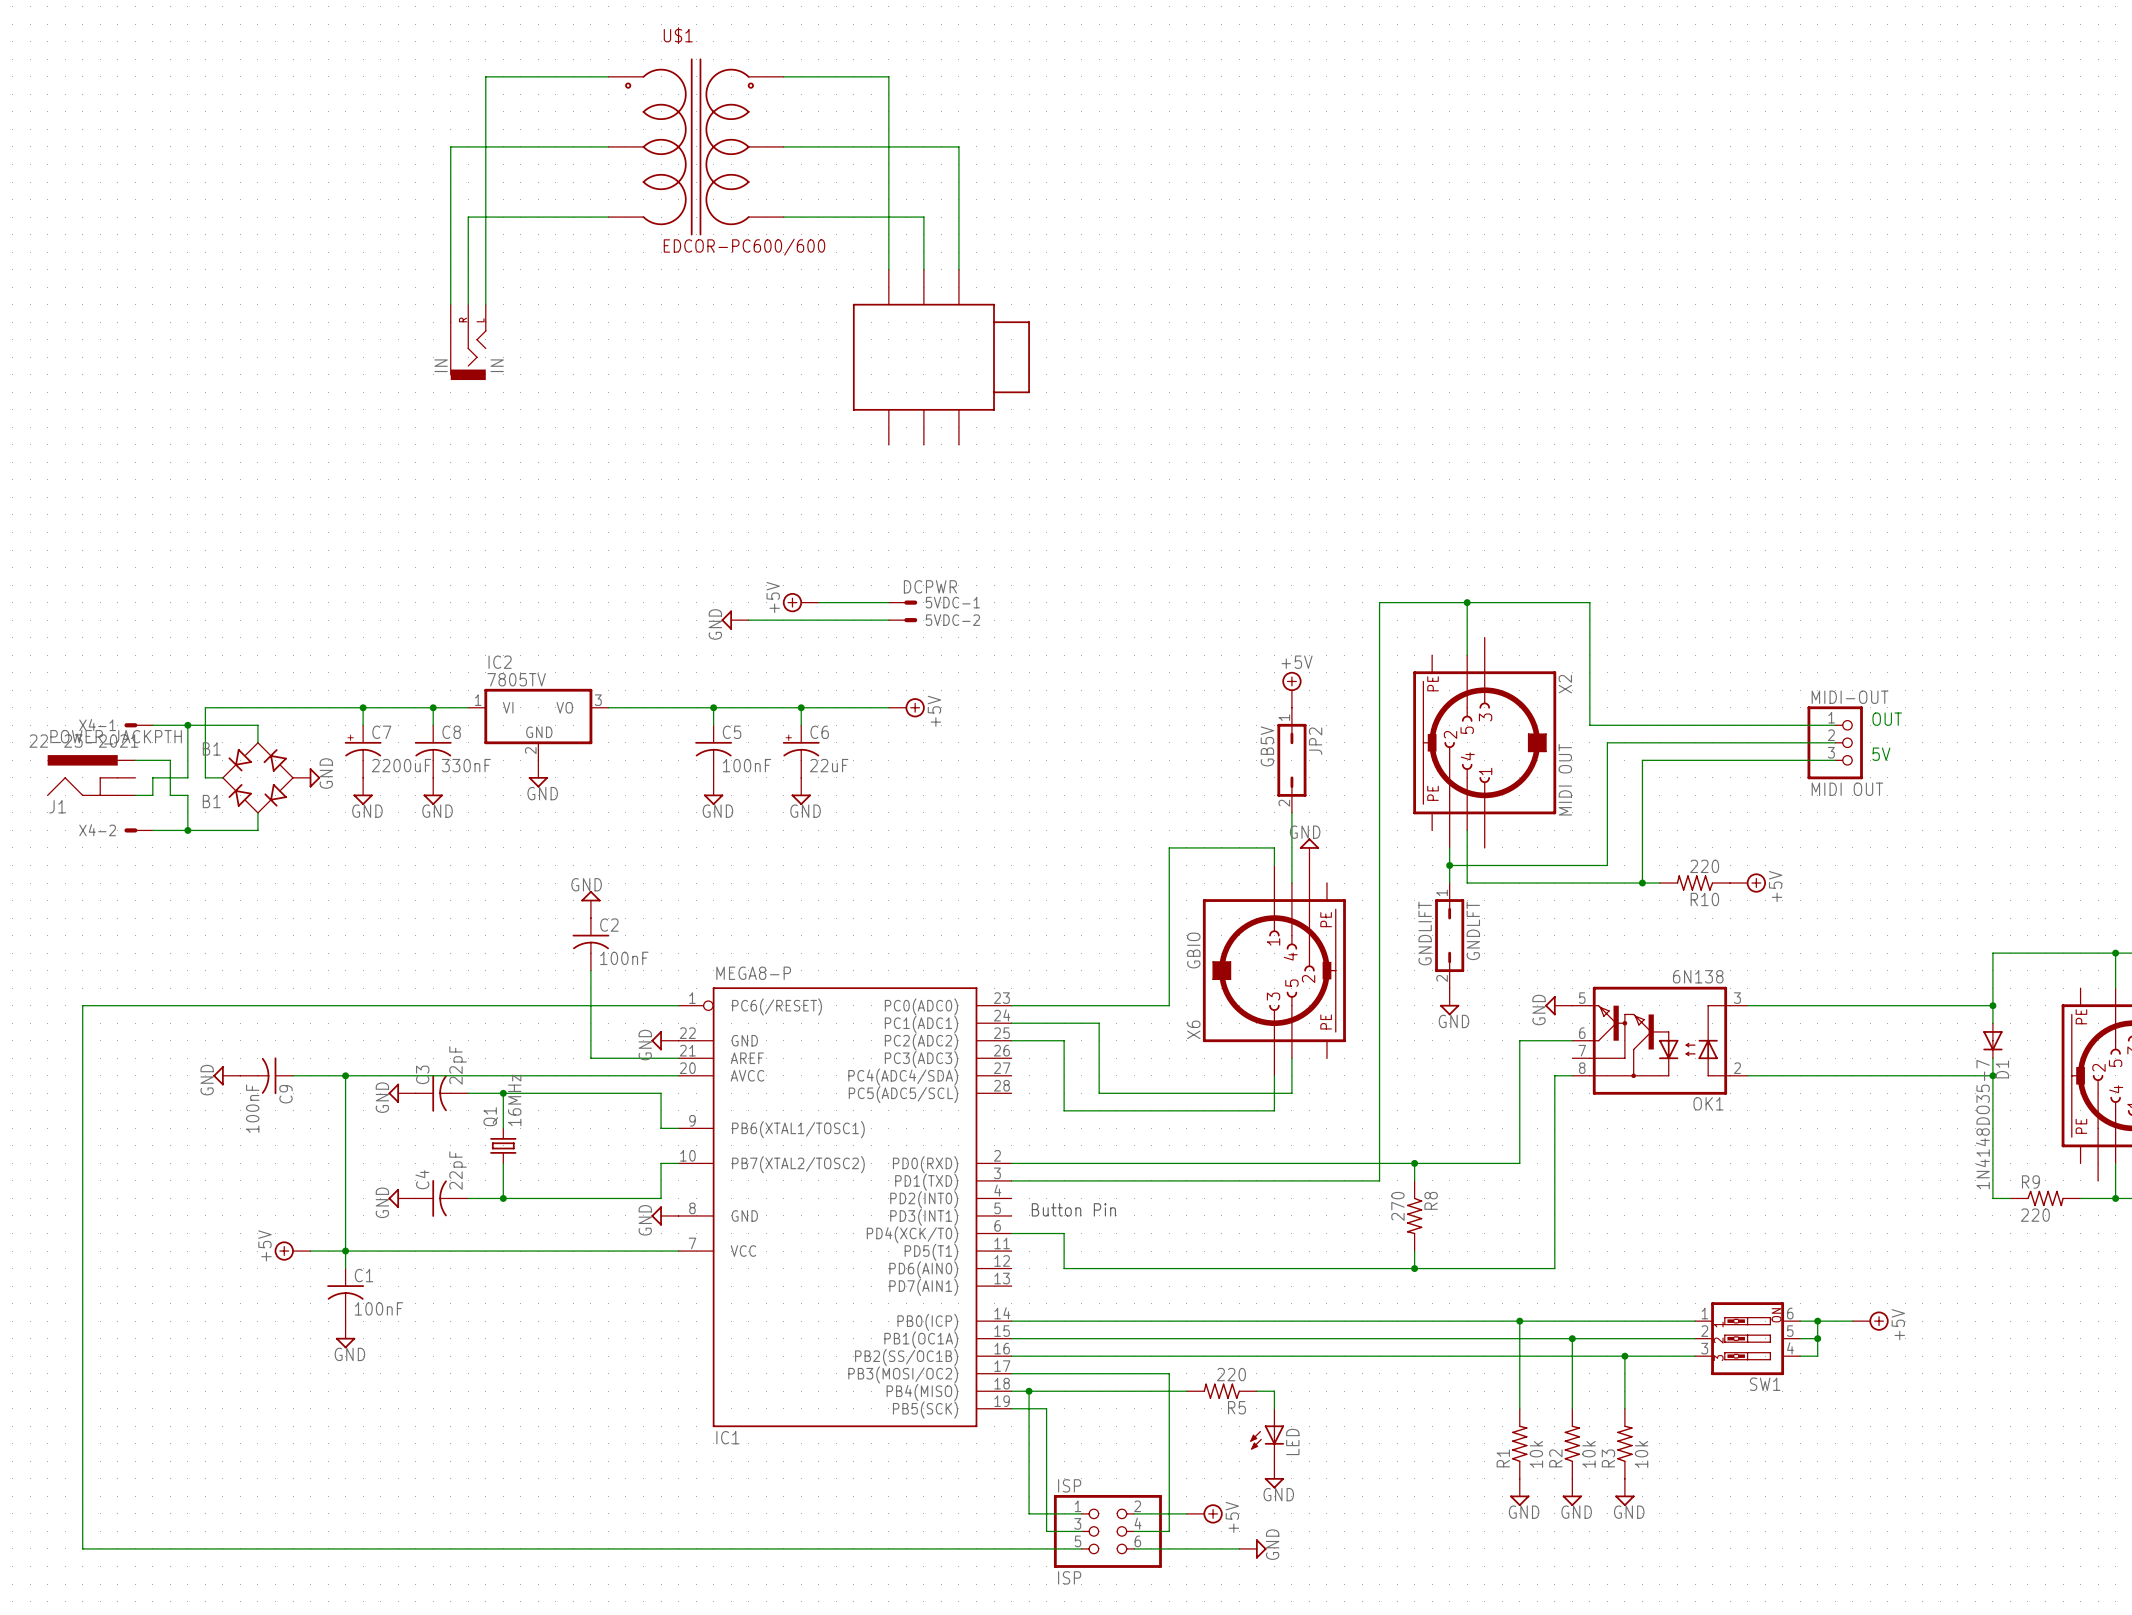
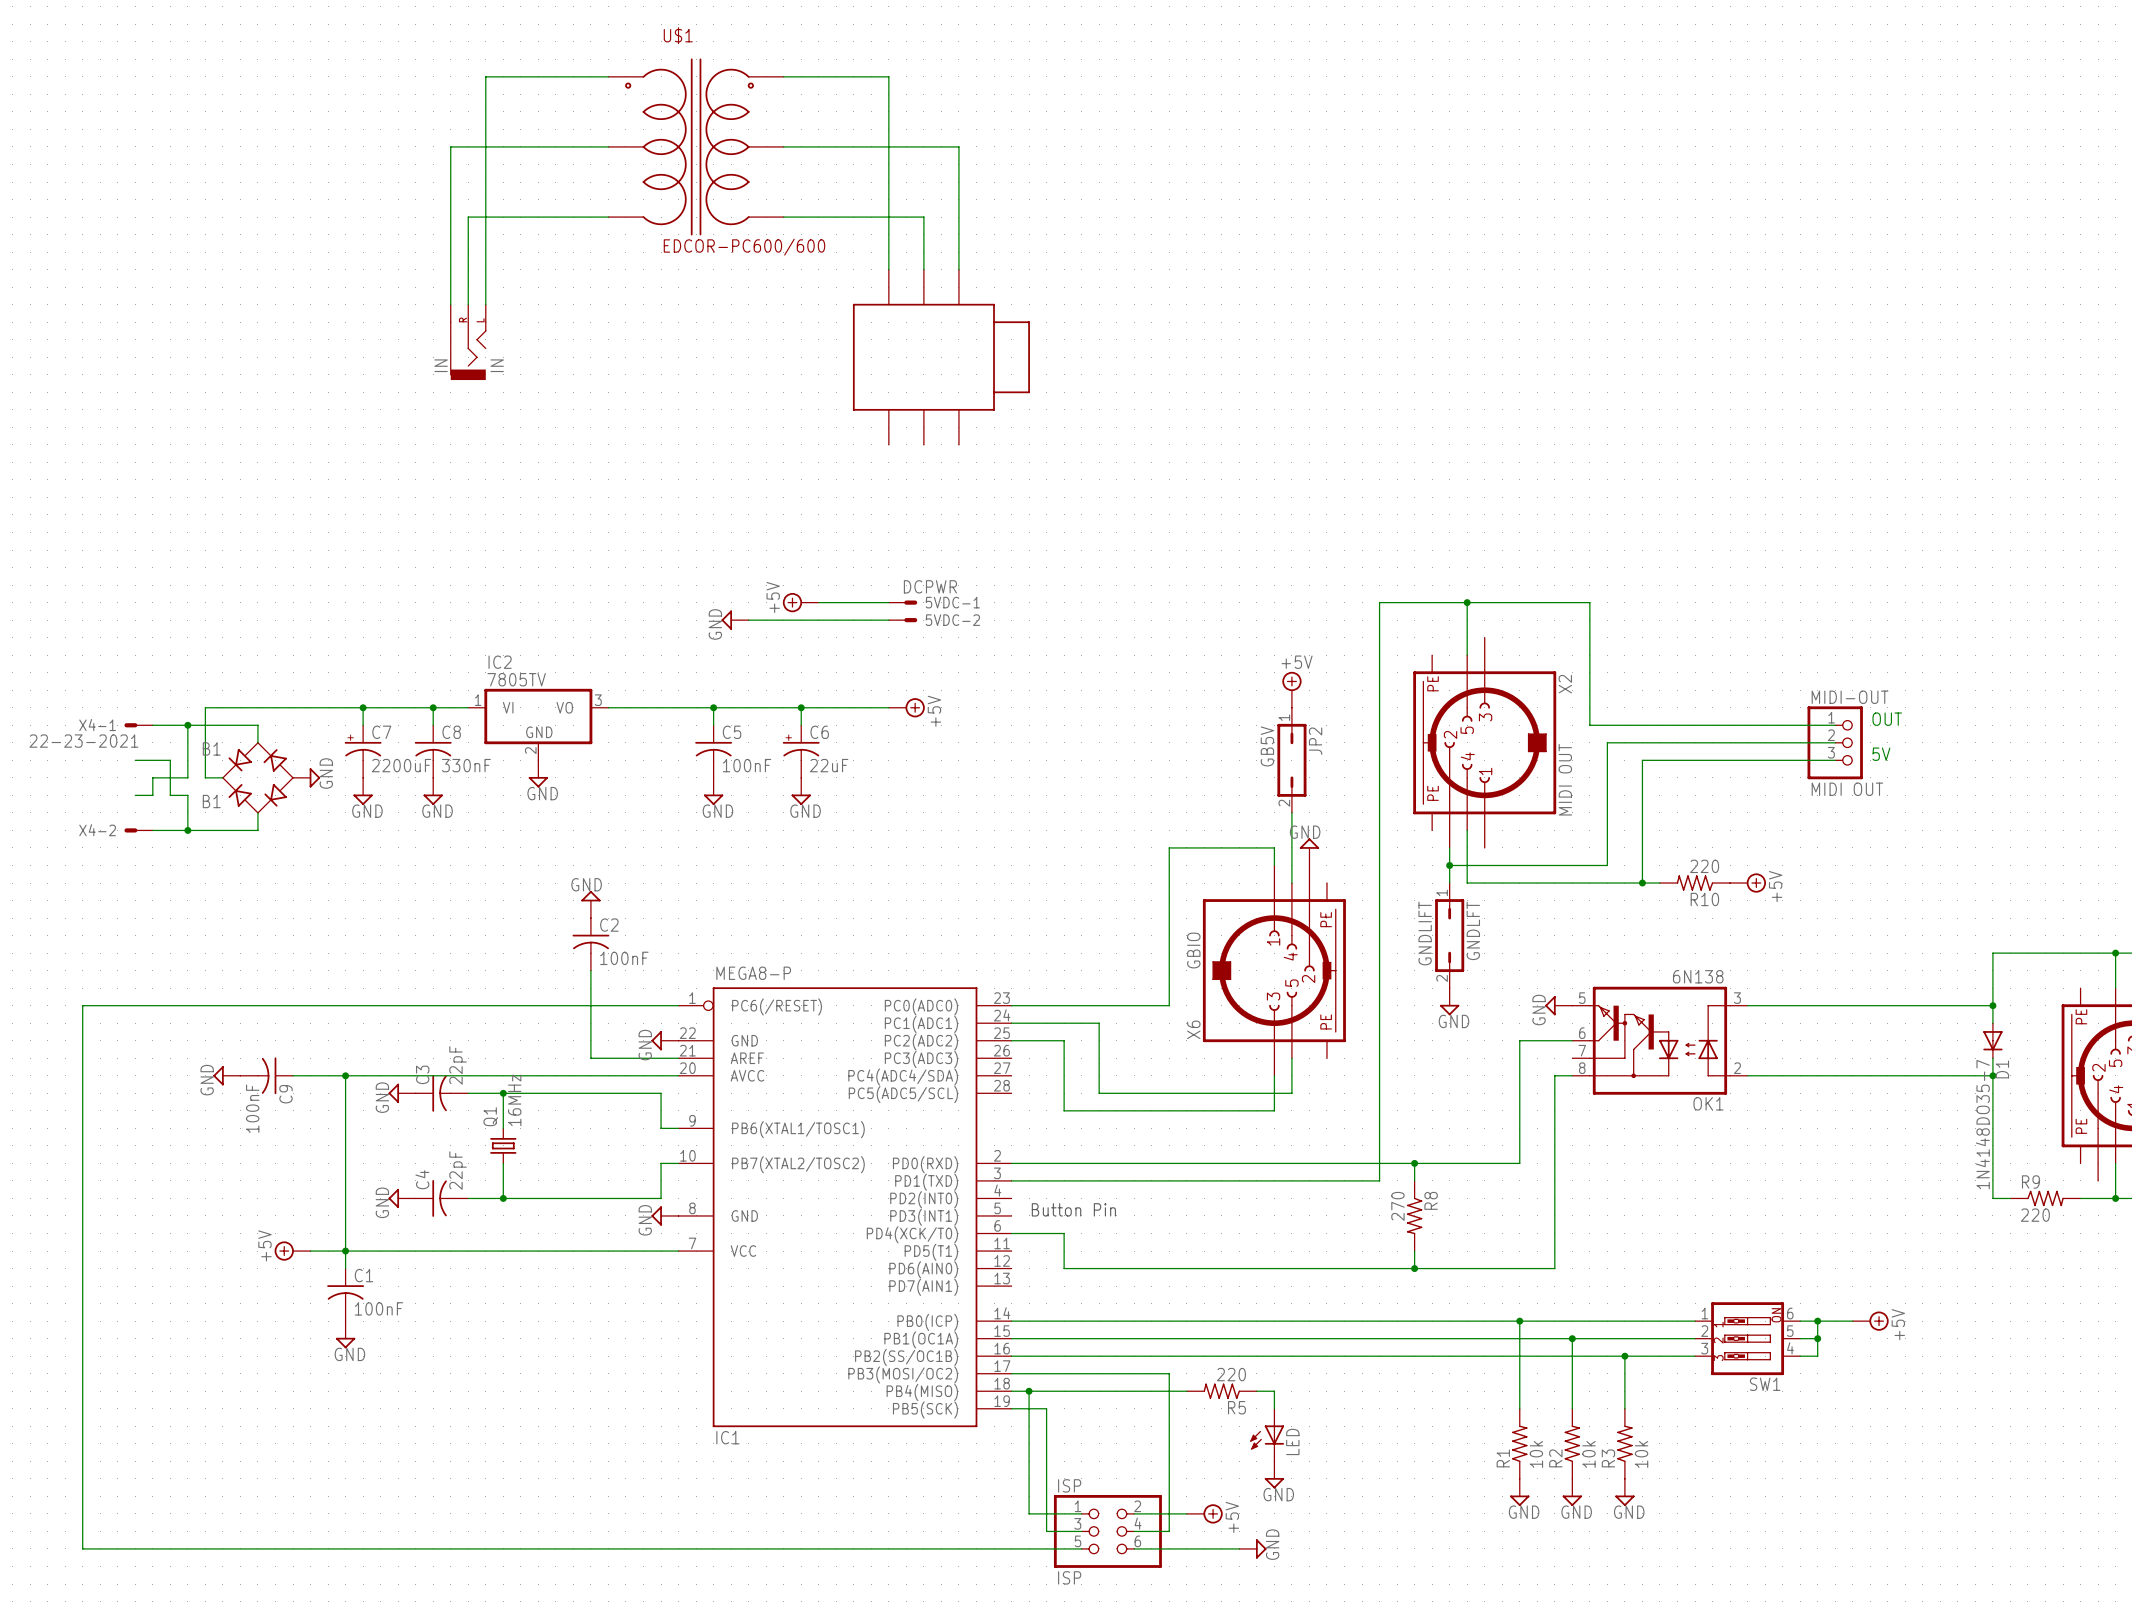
J1: POWER_JACKPTH (91, 775) -> none

